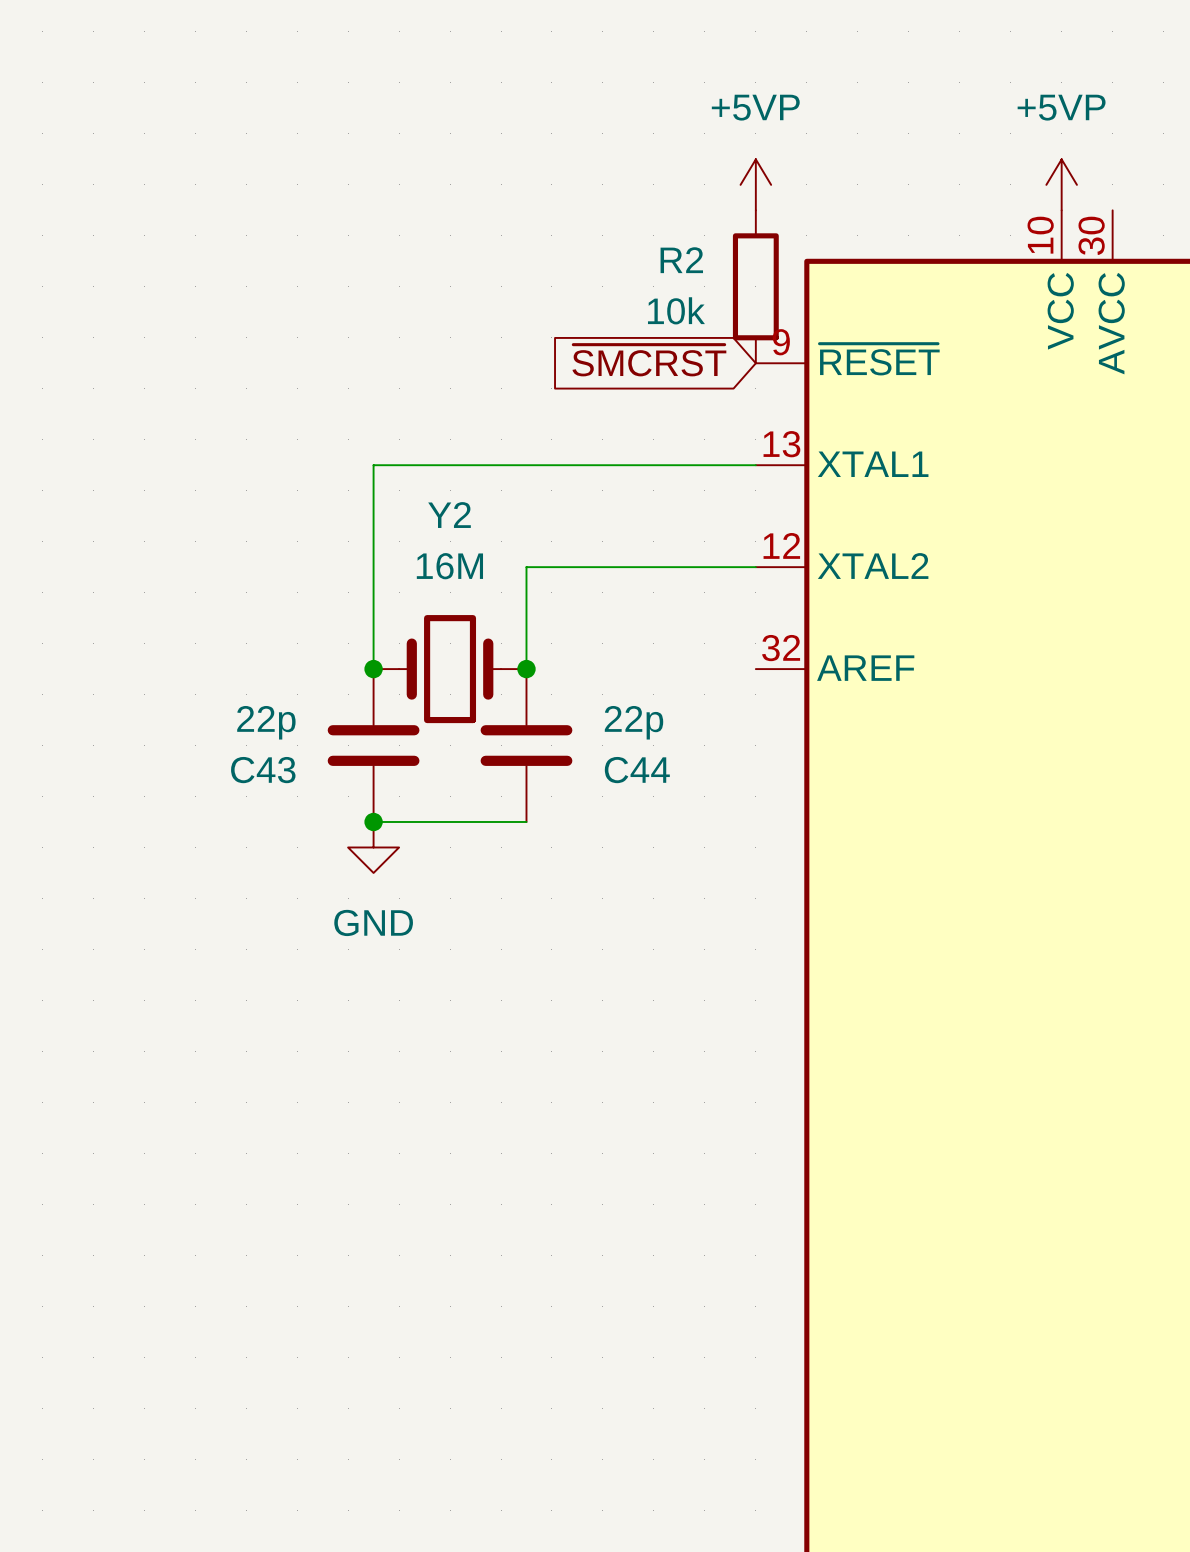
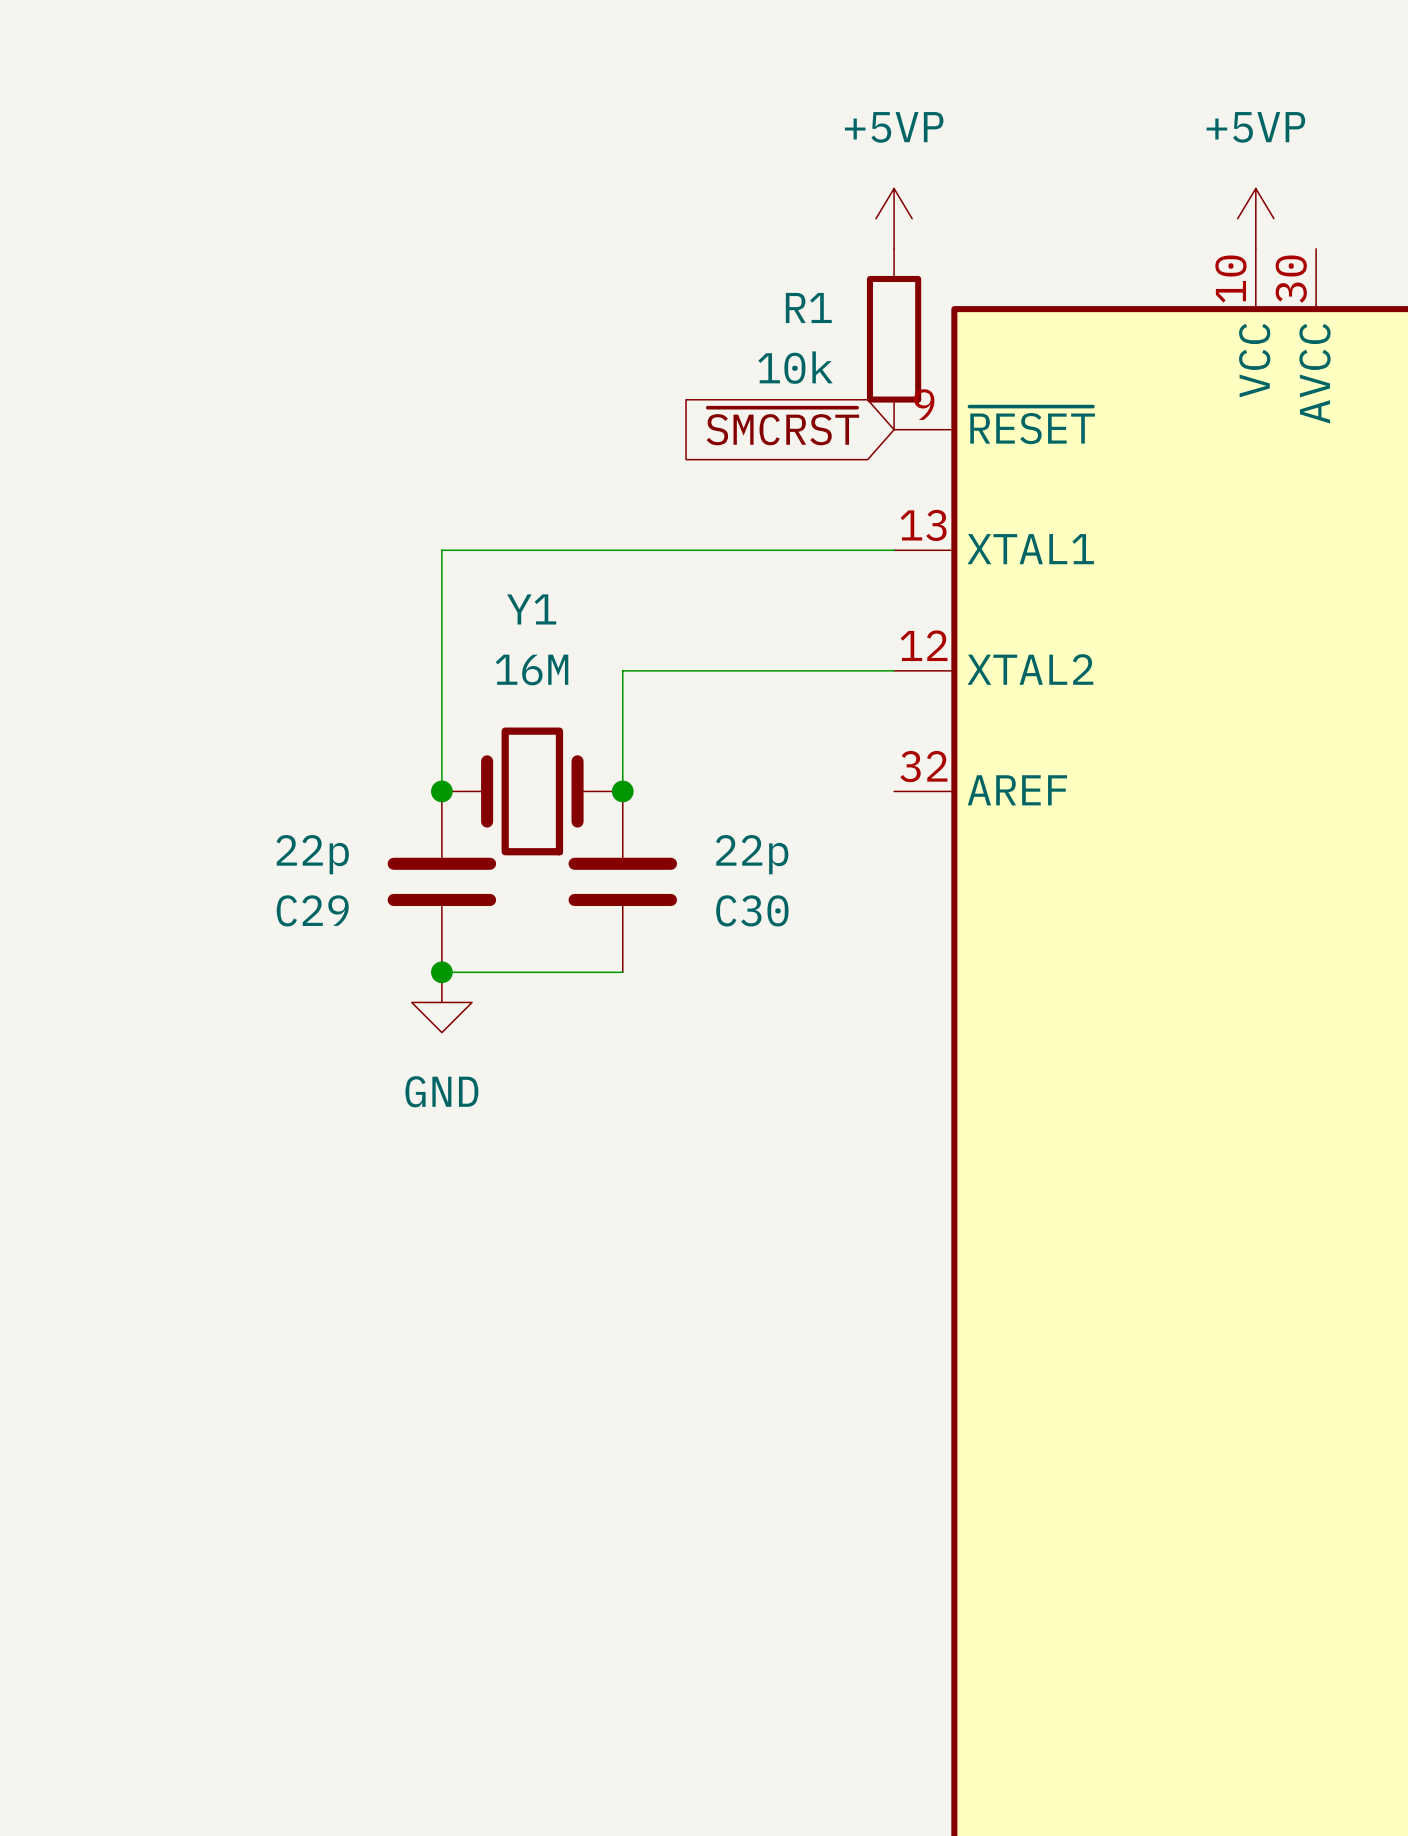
R2 name: R2 (681, 260) -> R1 (808, 307)
Y2 name: Y2 (449, 515) -> Y1 (531, 609)
C43 name: C43 (263, 770) -> C29 (312, 910)
C44 name: C44 (637, 770) -> C30 (752, 910)

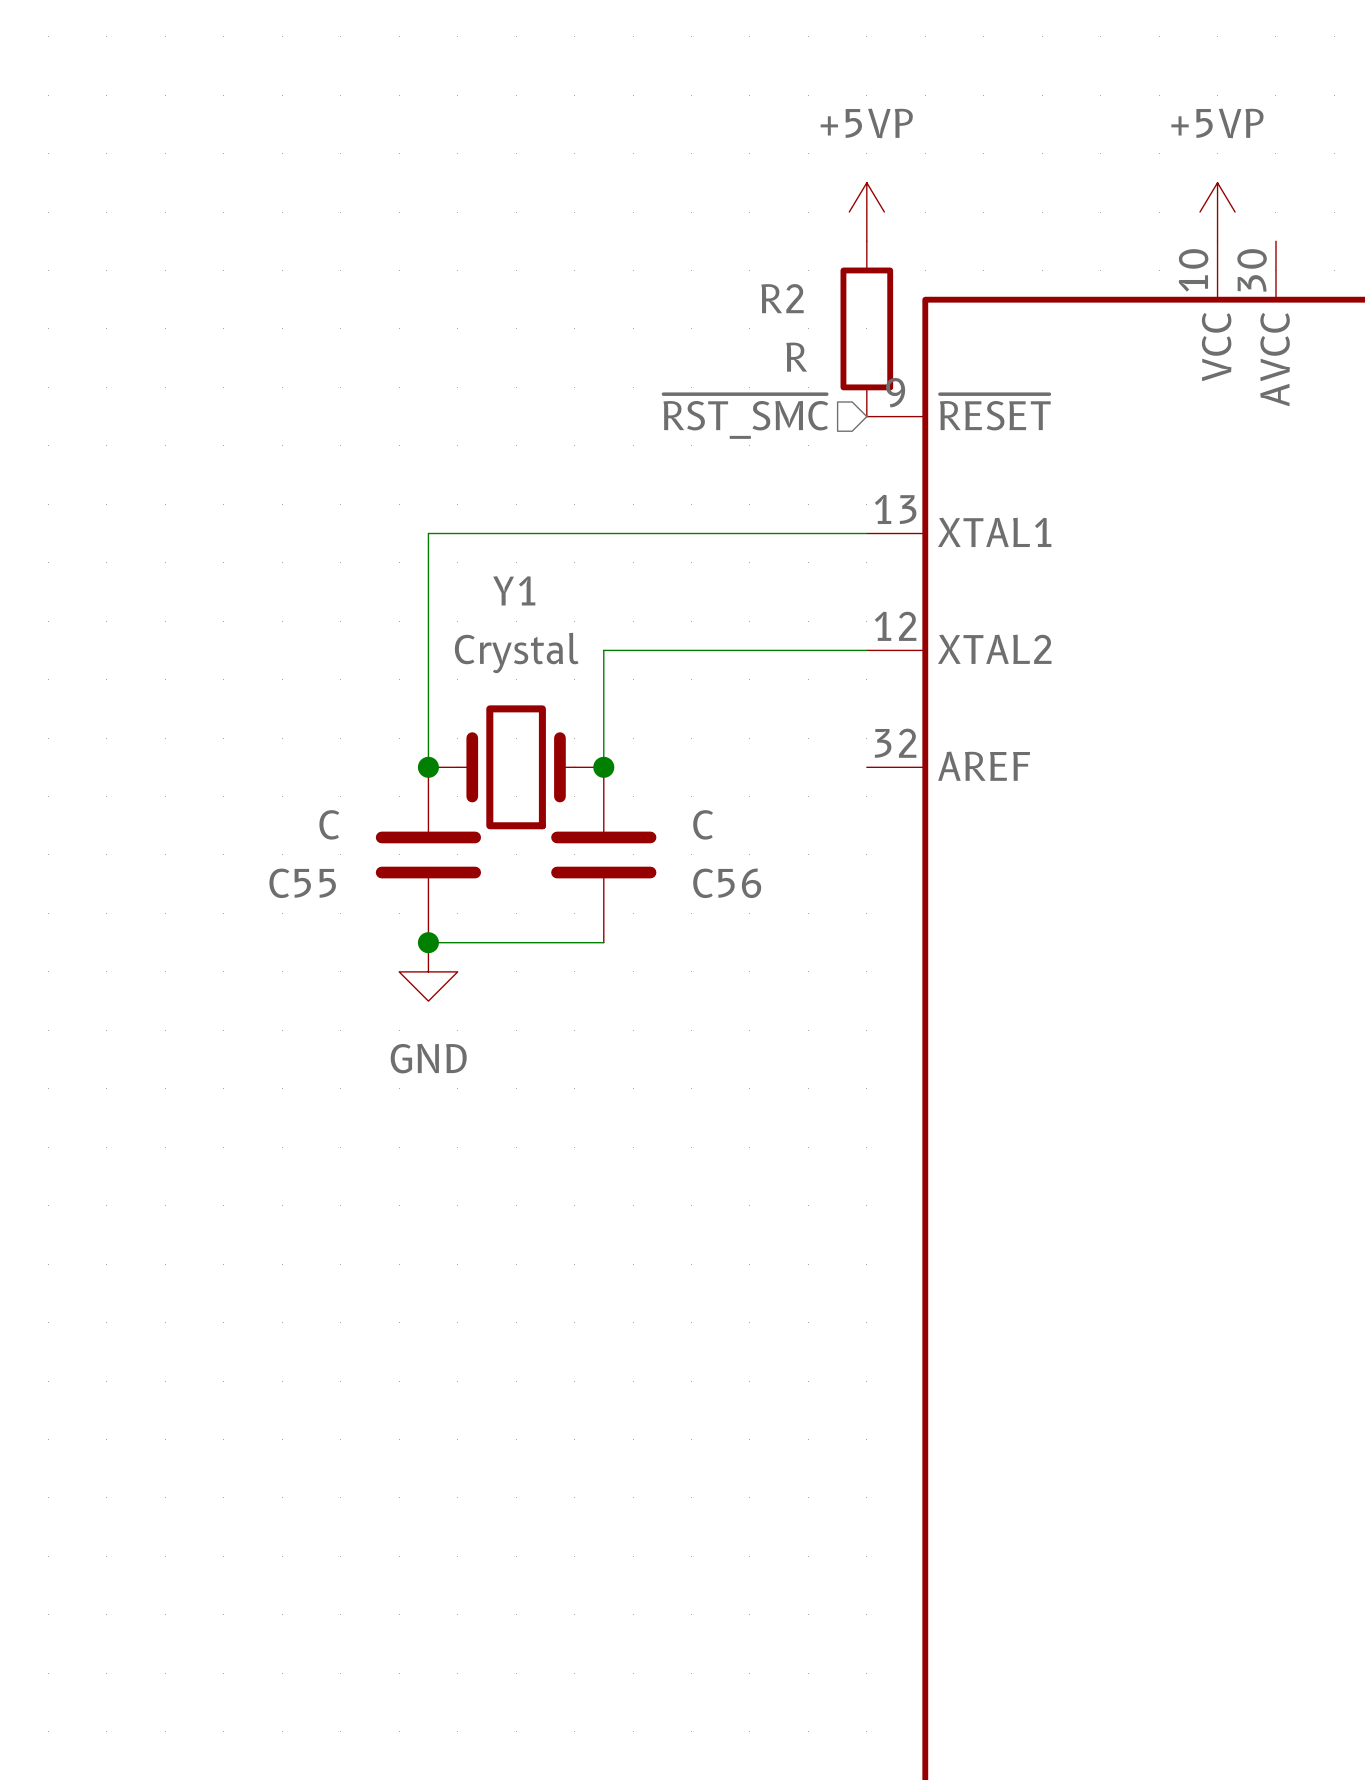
R1 name: R1 (808, 307) -> R2 (782, 298)
R1 value: 10k (795, 367) -> R (796, 357)
global label: ~{SMCRST} (782, 426) -> none
hierarchical label: none -> ~{RST_SMC} (745, 416)
Y1 value: 16M (532, 669) -> Crystal (516, 652)
C29 value: 22p (312, 854) -> C (329, 824)
C30 value: 22p (752, 854) -> C (703, 824)
C29 name: C29 (312, 910) -> C55 (302, 883)
C30 name: C30 (752, 910) -> C56 (727, 883)

